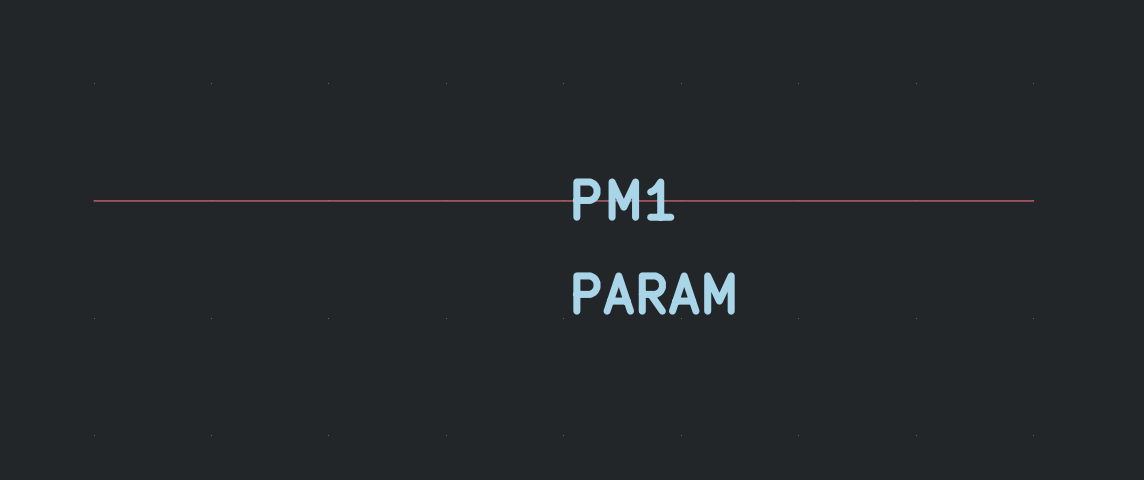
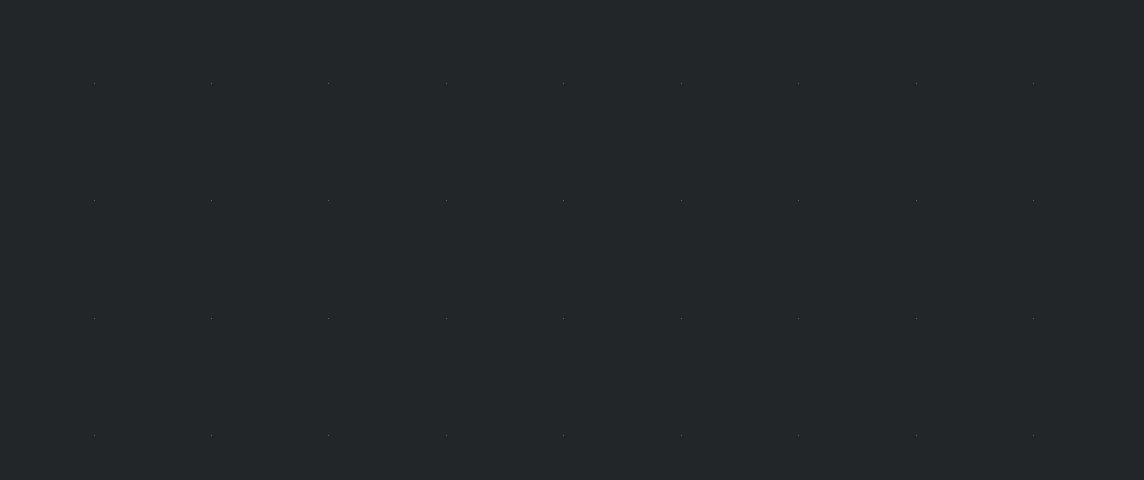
PM1: PARAM (563, 200) -> none

